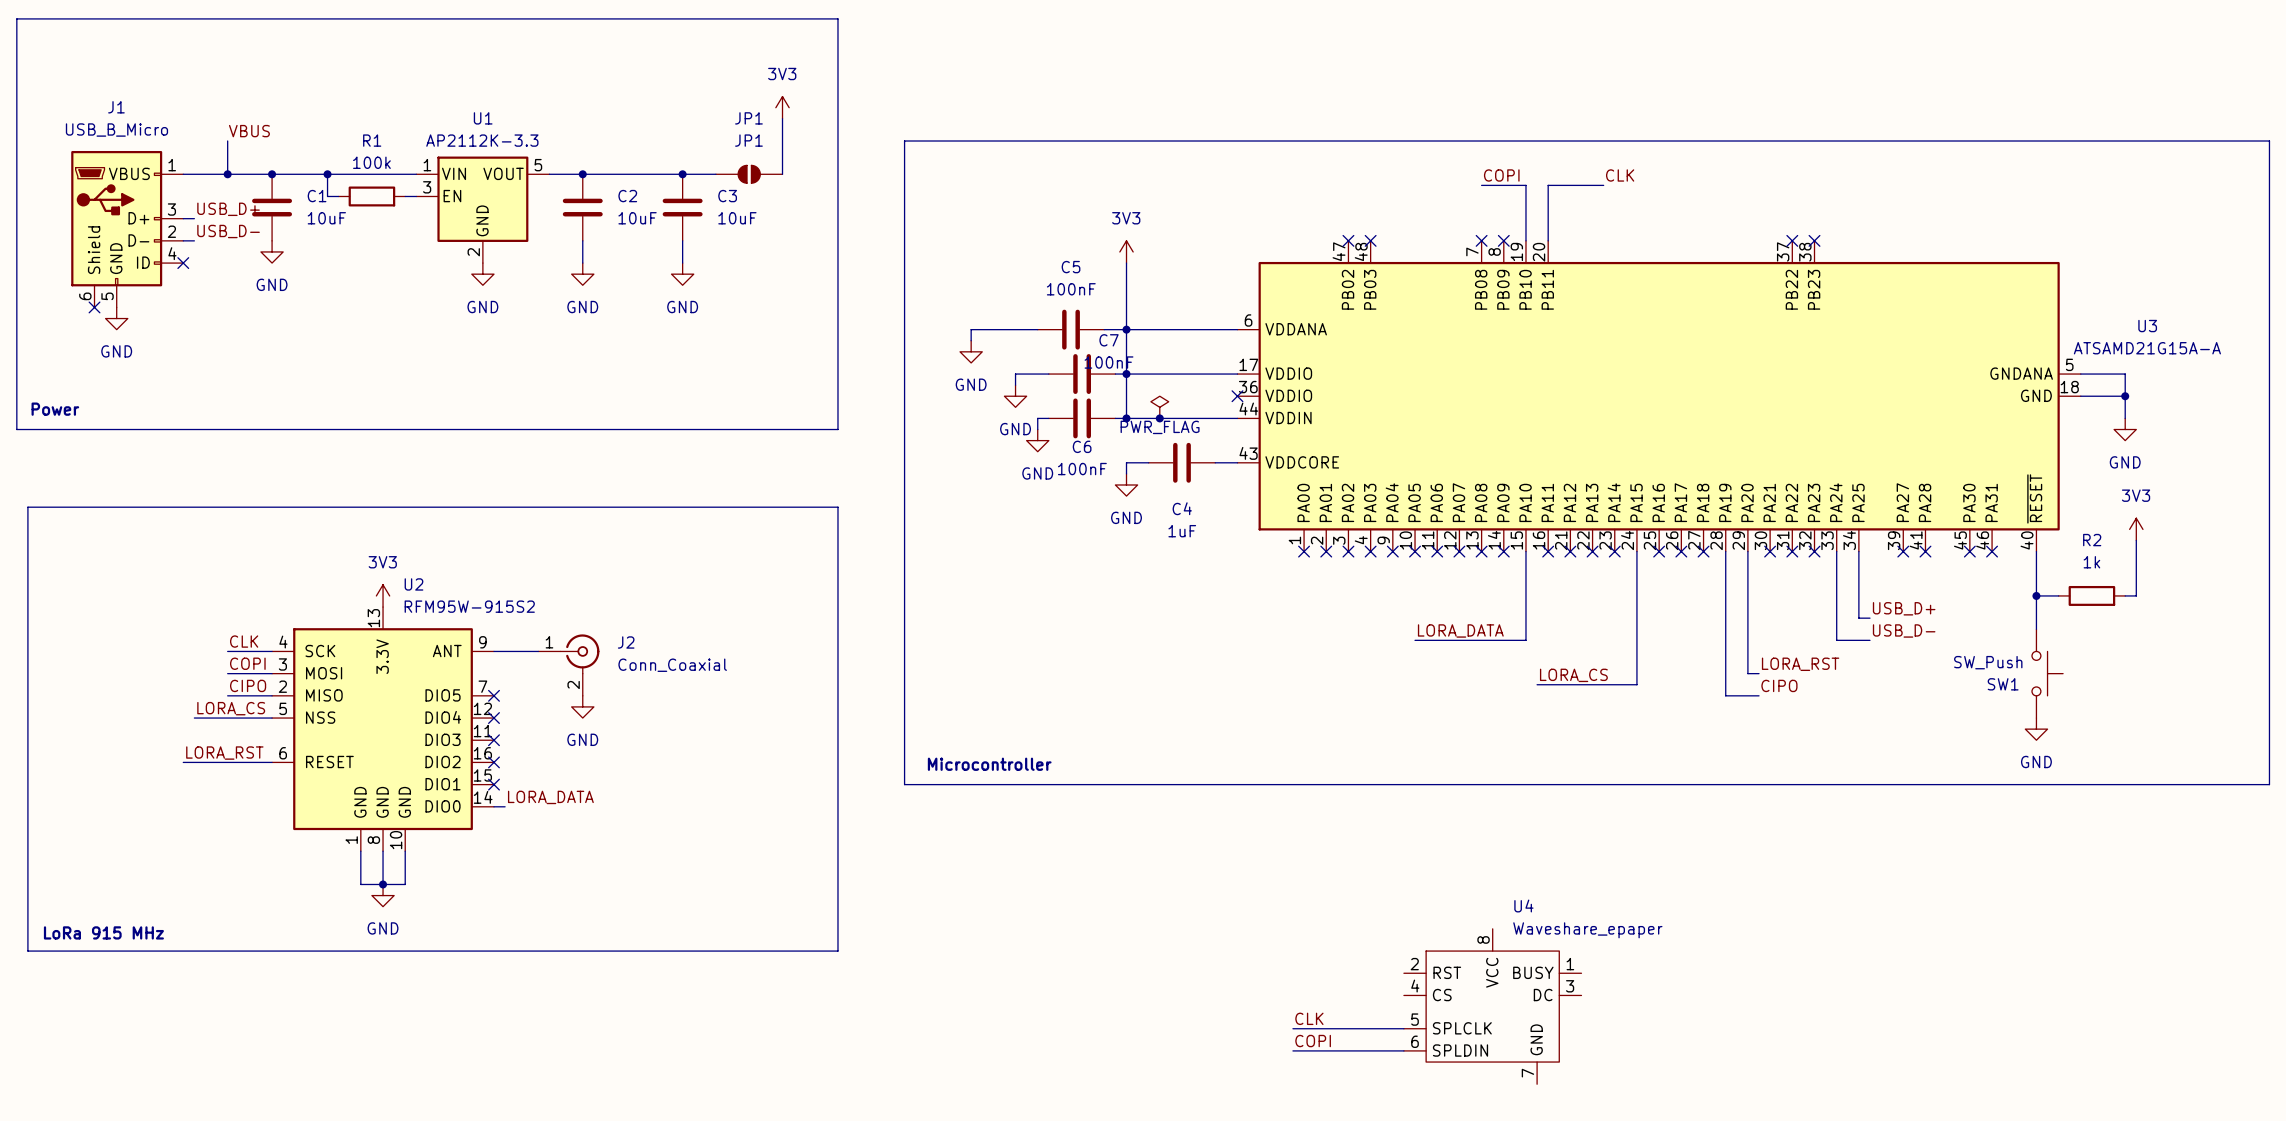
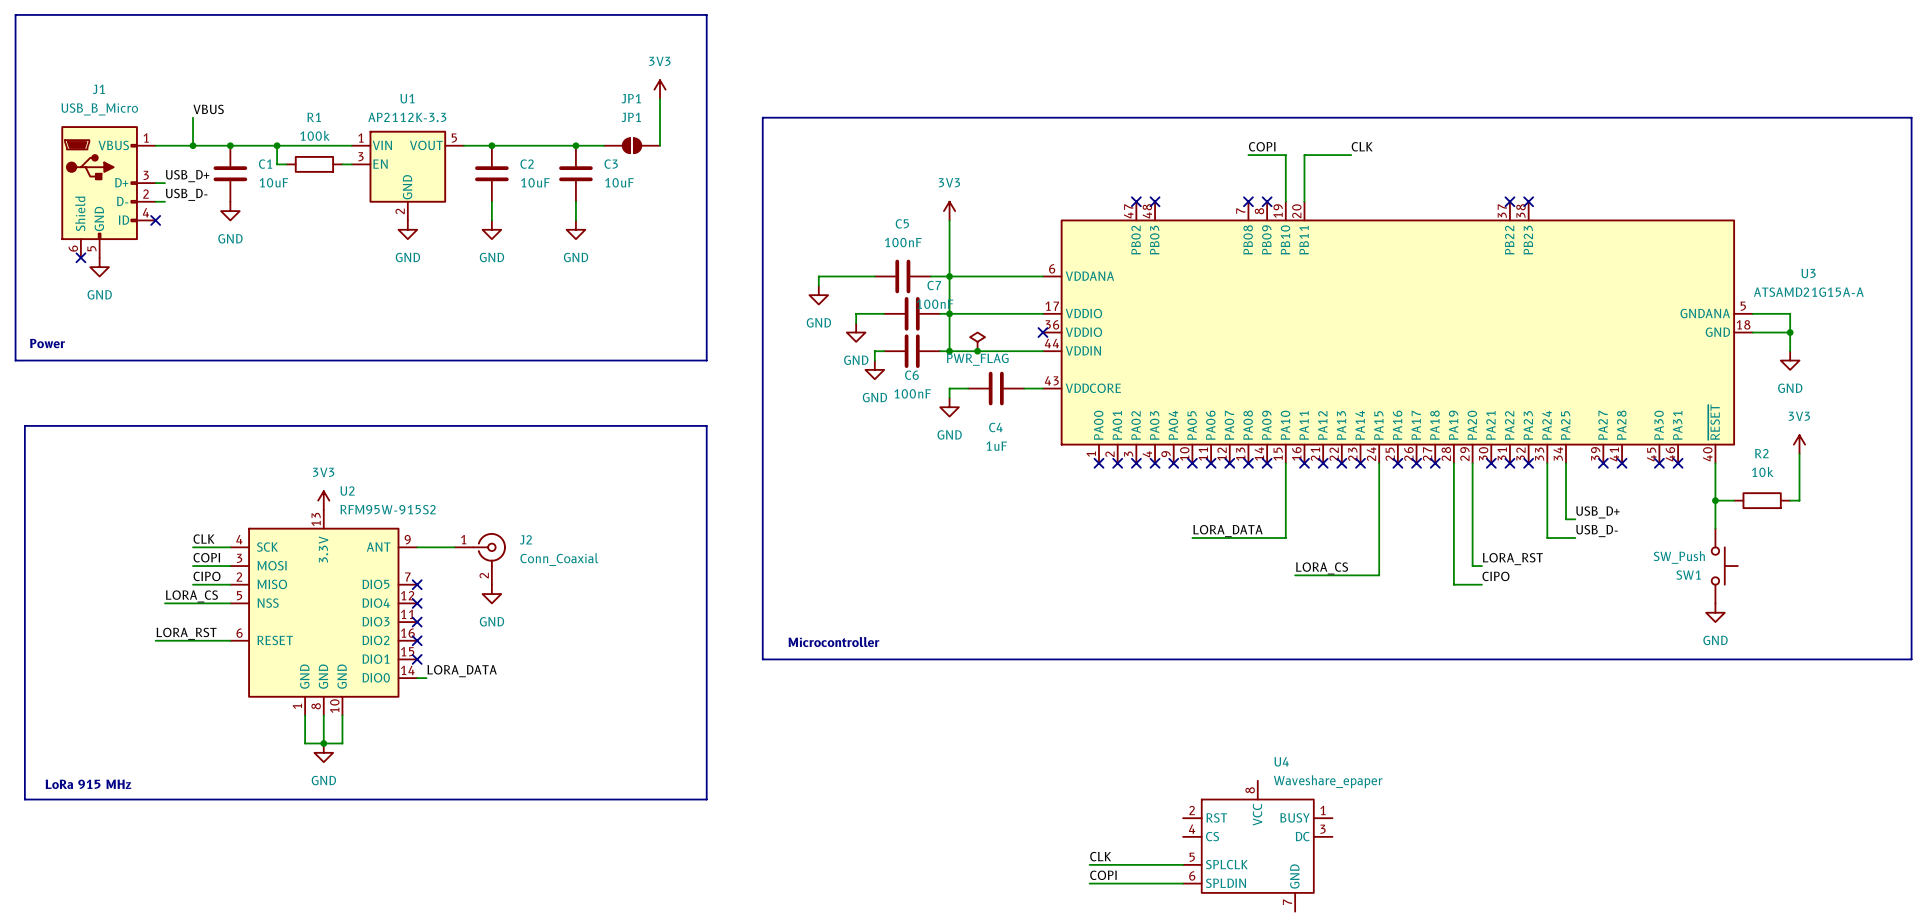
R2 value: 1k (2091, 562) -> 10k (1762, 472)

